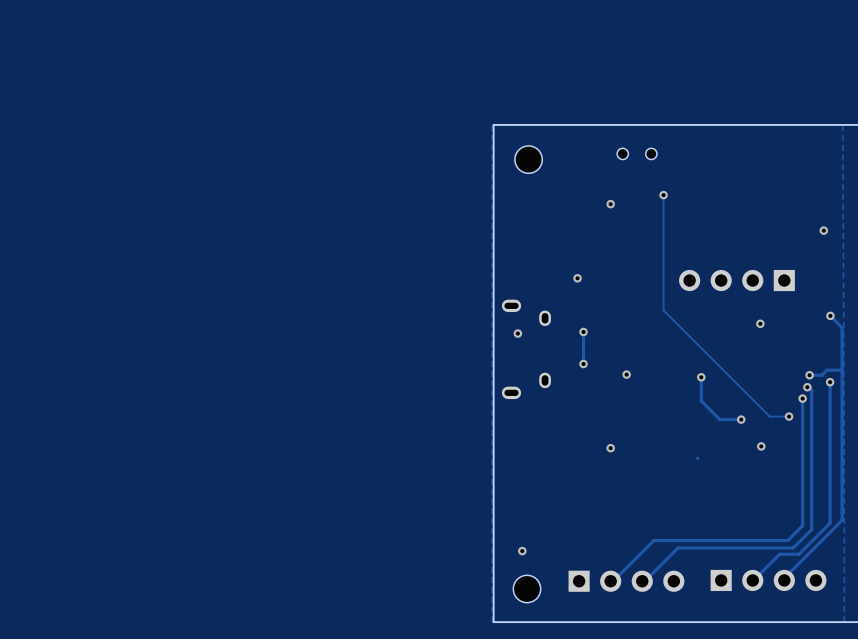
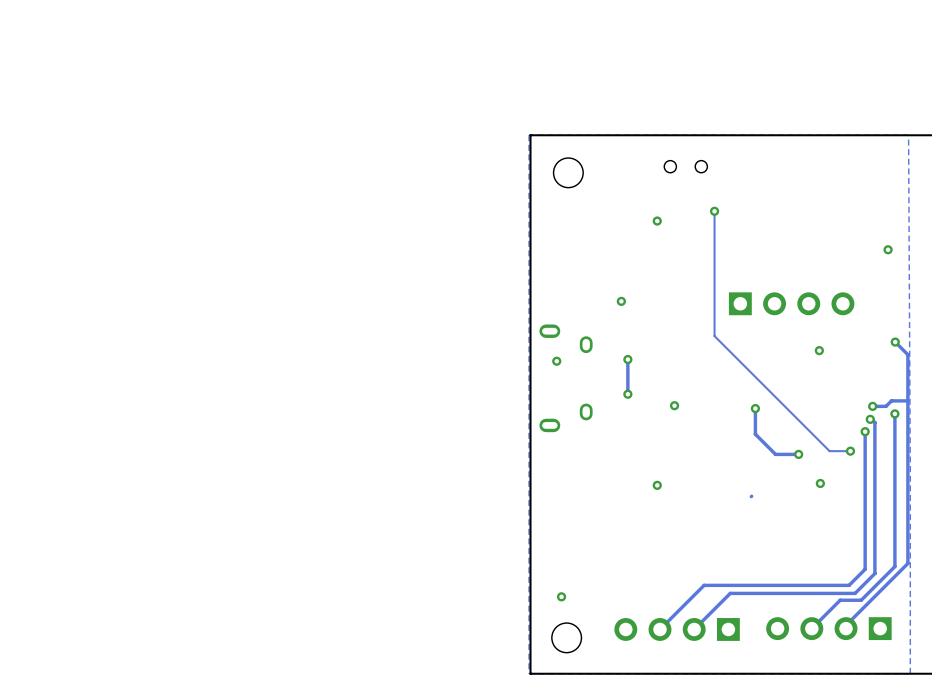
part rotation: 0° (736, 280) -> 180° (791, 303)
part rotation: 0° (768, 580) -> 180° (828, 628)
part rotation: 0° (626, 581) -> 180° (677, 629)

